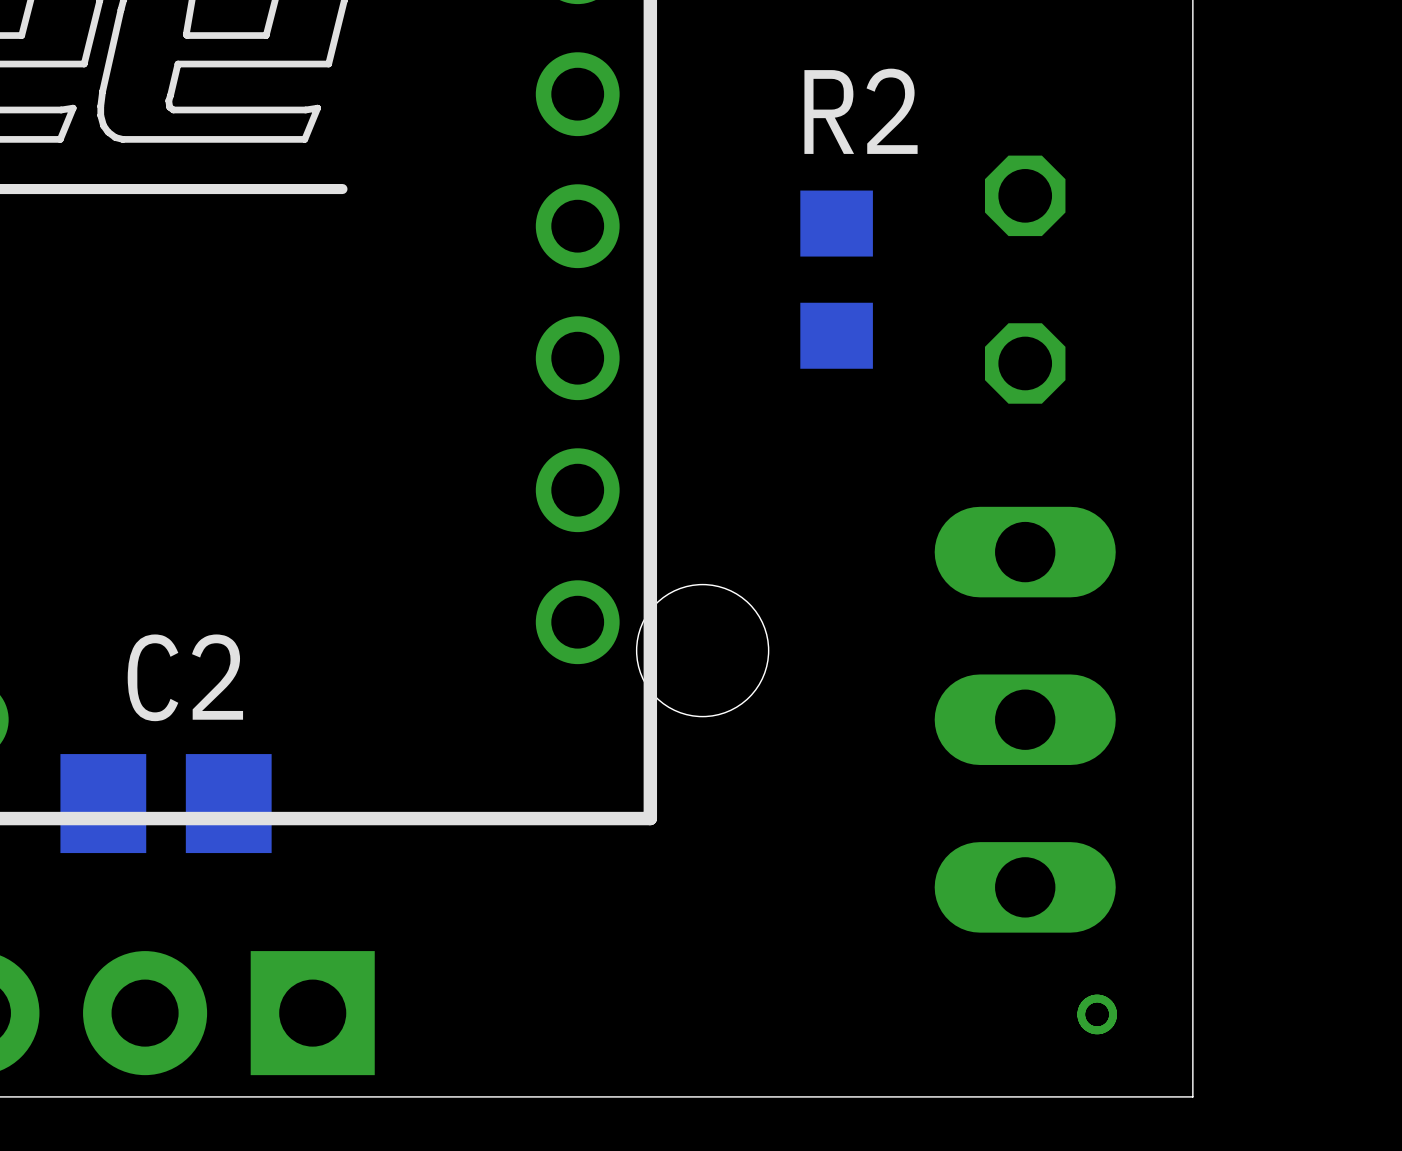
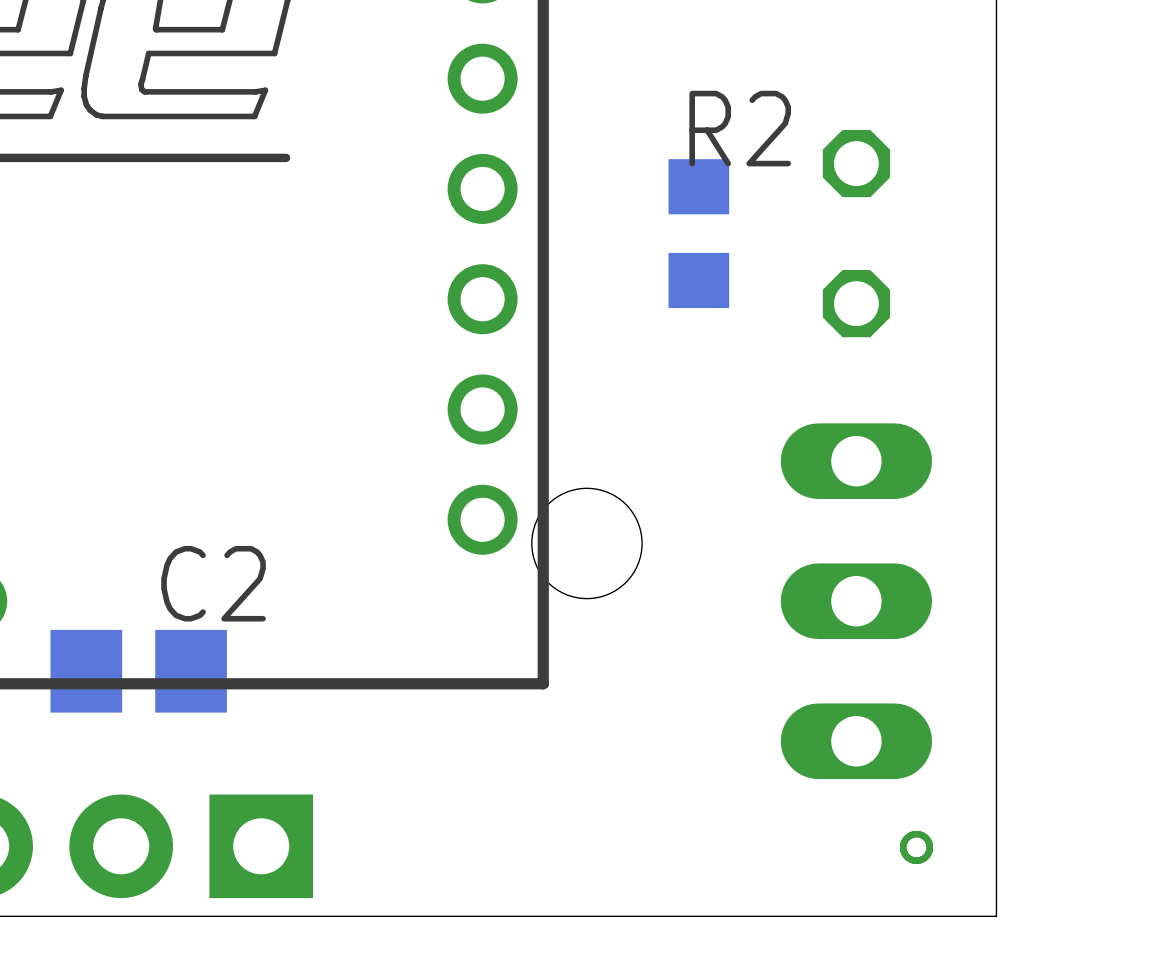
R2 name position: R2 (861, 111) -> R2 (740, 128)
C2 name position: C2 (185, 677) -> C2 (213, 583)

